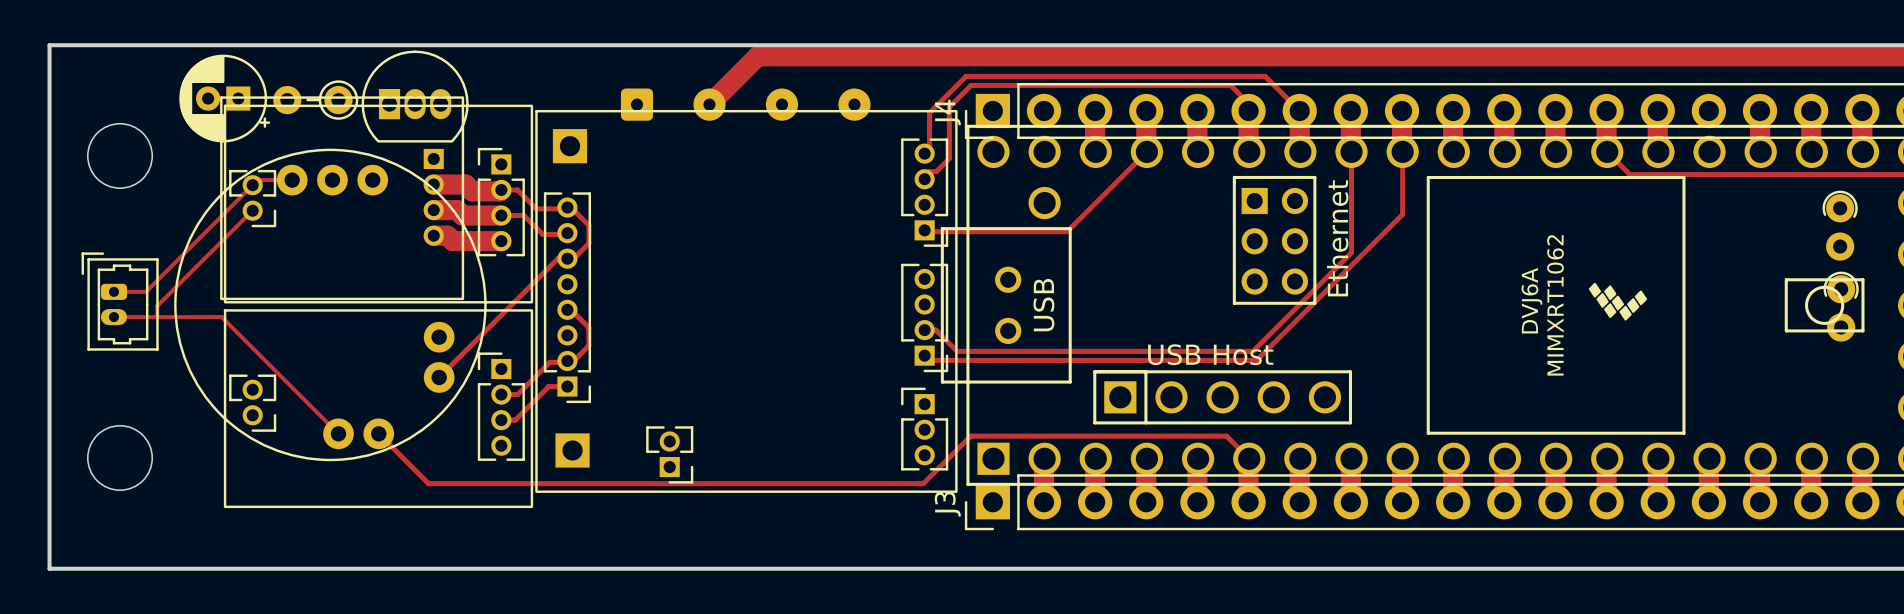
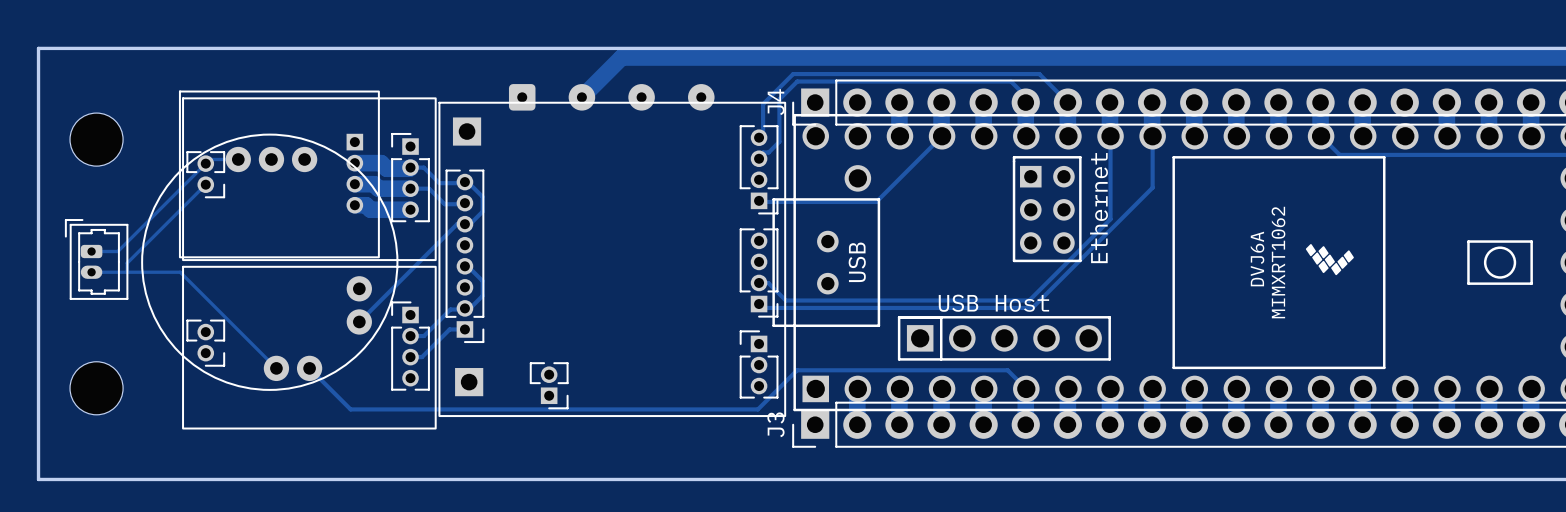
part: (415, 96) -> none
part: (224, 98) -> none
part: (315, 100) -> none
part: (1840, 225) -> none
part: (1841, 306) -> none

